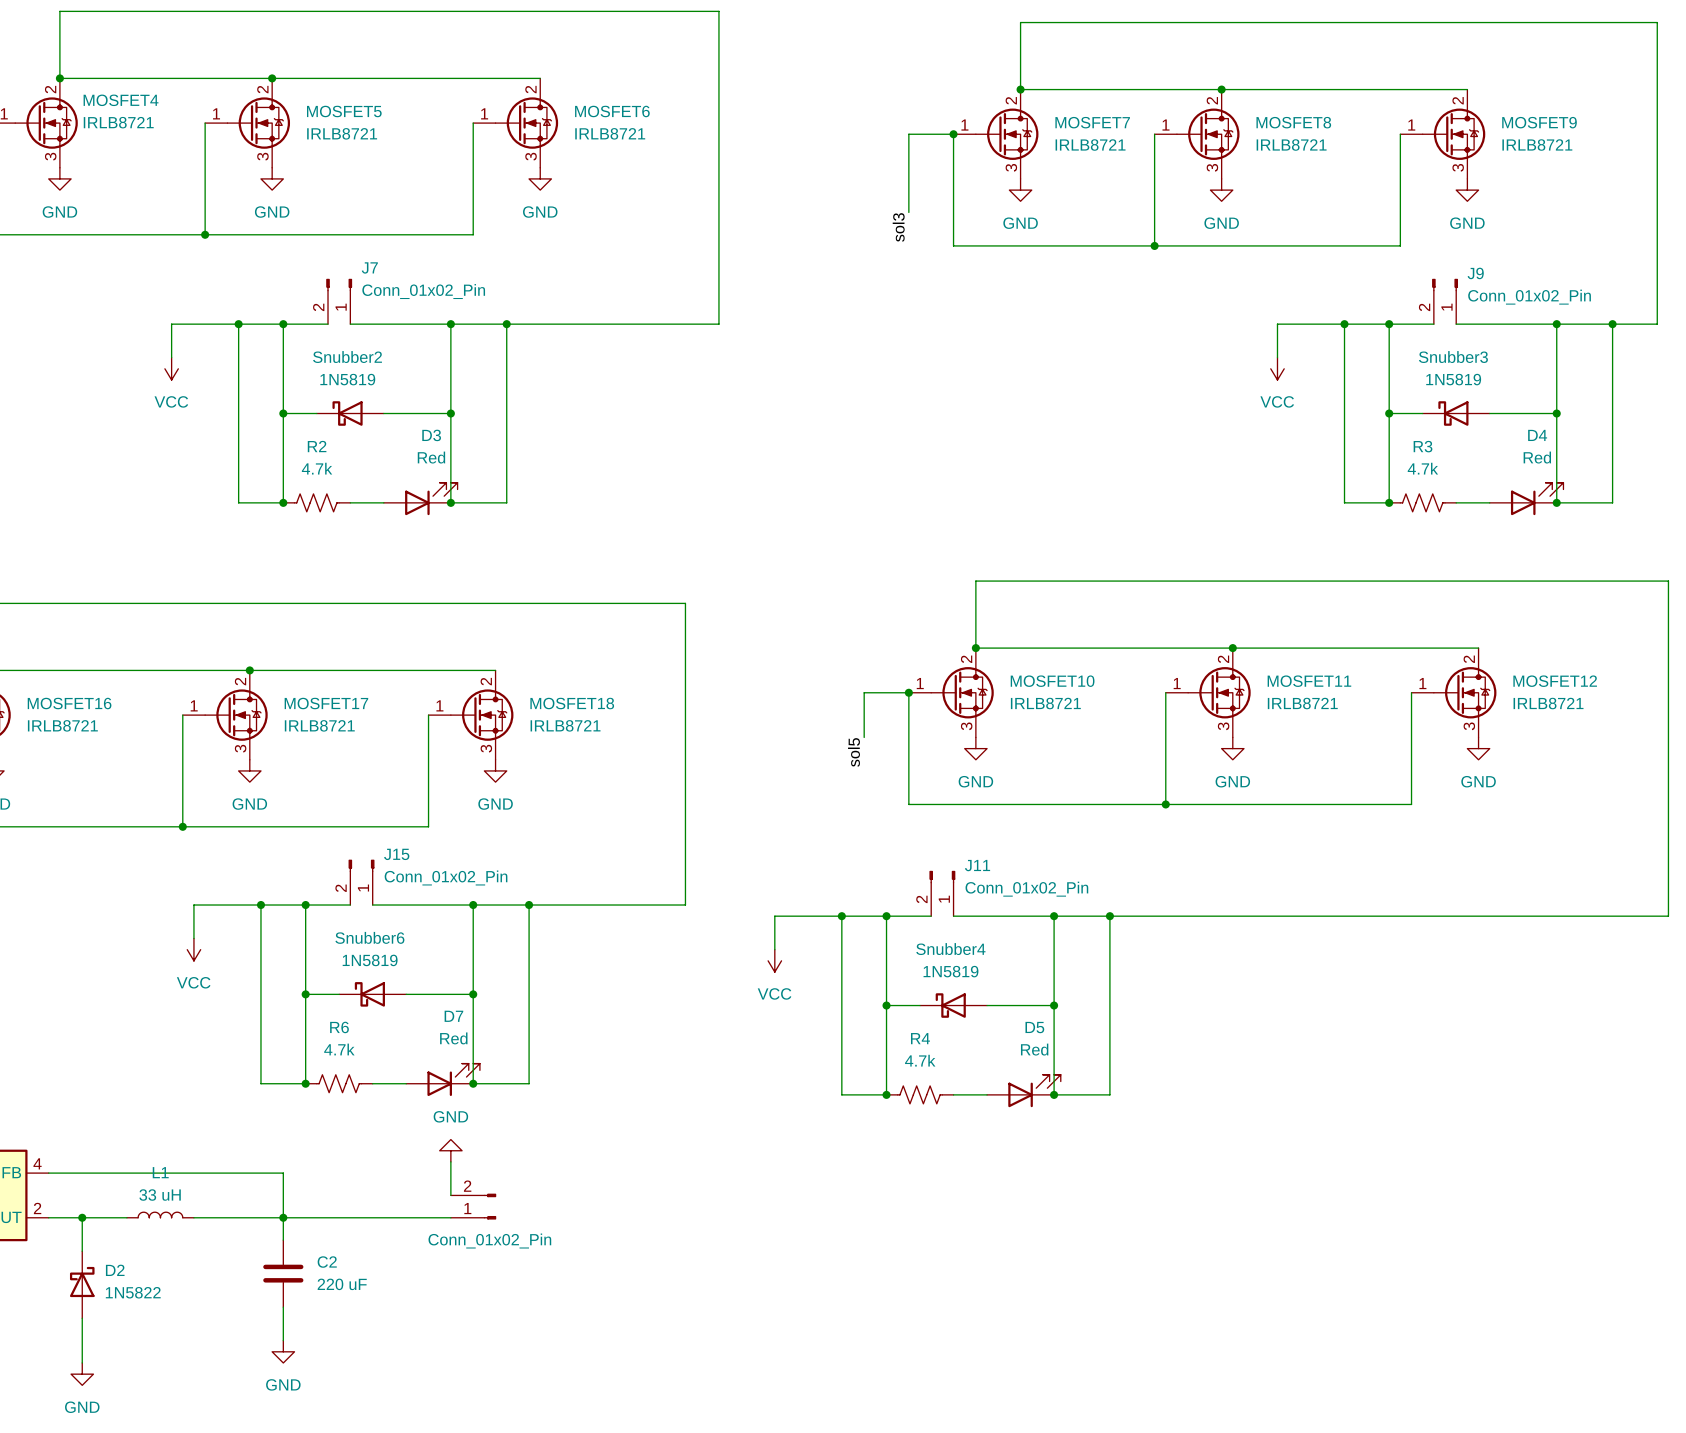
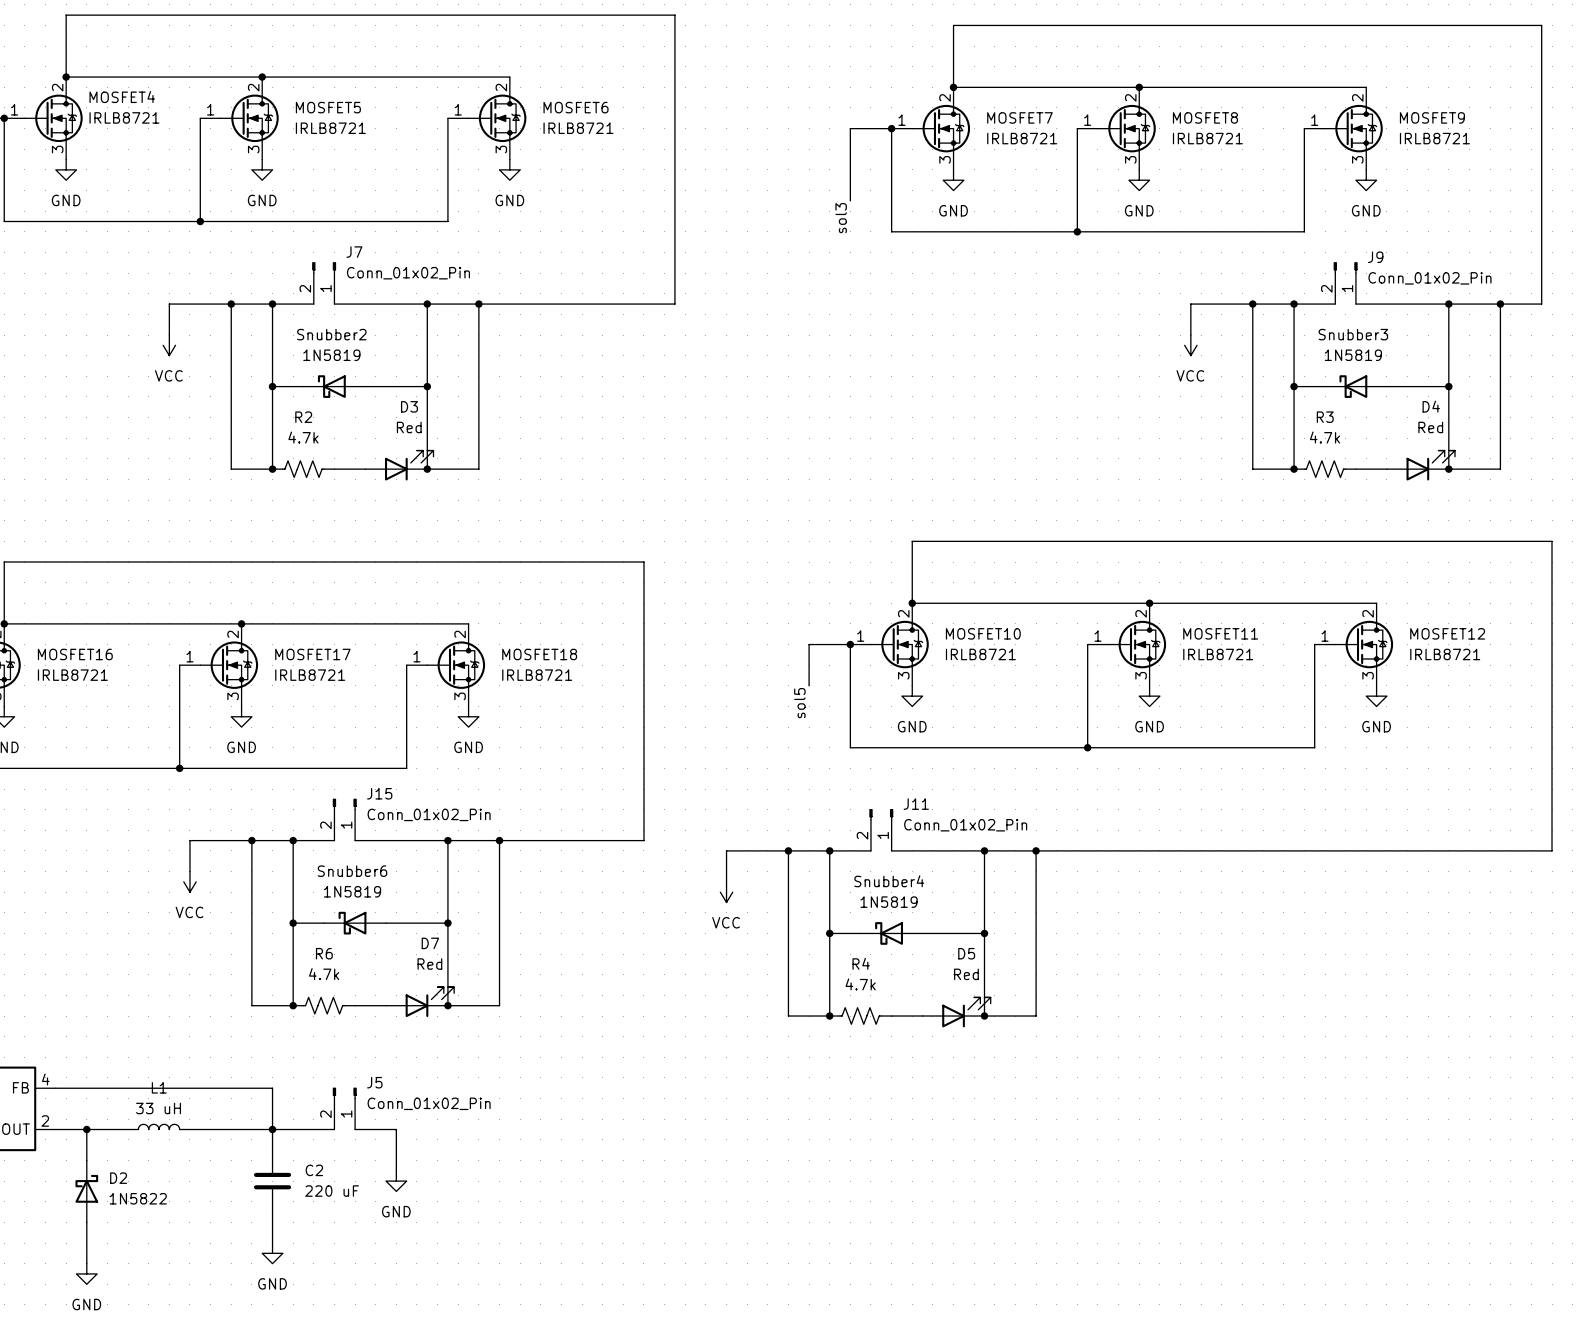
power symbol rotation: 0° (450, 1150) -> 180° (396, 1181)
power symbol position: GND (450, 1150) -> GND (396, 1181)
wire: (450, 1161) (450, 1195) -> none
J5: none -> Conn_01x02_Pin (344, 1108)
part: Conn_01x02_Pin (473, 1206) -> none
wire: (350, 1217) (372, 1217) -> none
wire: (417, 1217) (450, 1217) -> (396, 1129) (396, 1170)

